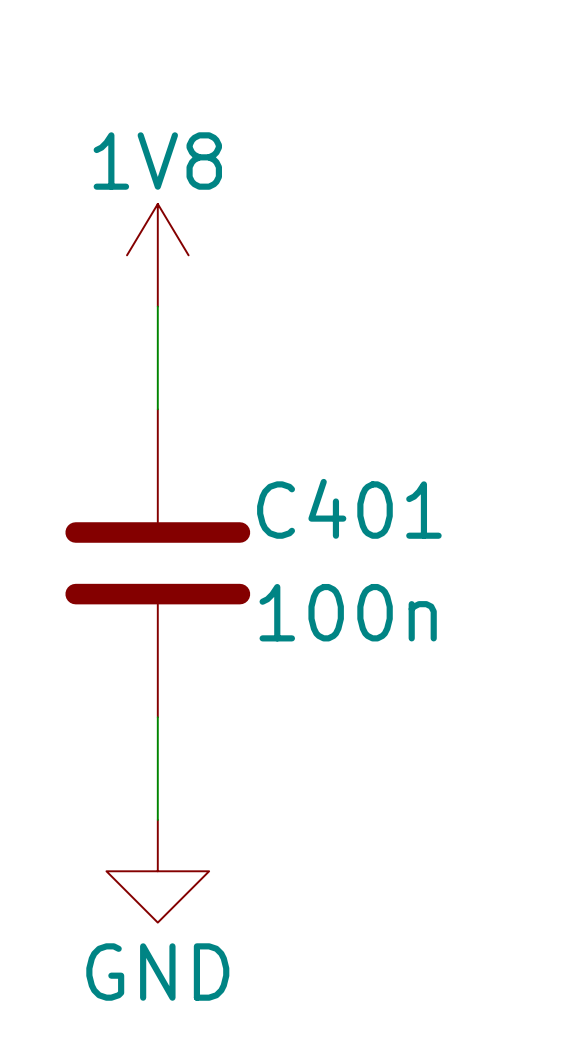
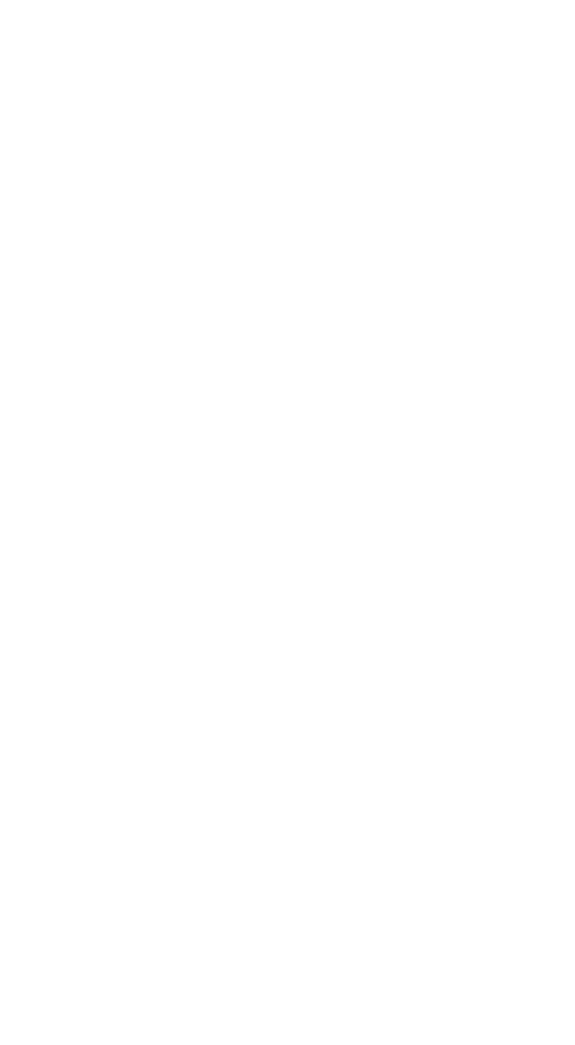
power symbol: 1V8 (157, 255) -> none
wire: (157, 306) (157, 409) -> none
C401: 100n (157, 563) -> none
wire: (157, 717) (157, 819) -> none
power symbol: GND (157, 871) -> none

